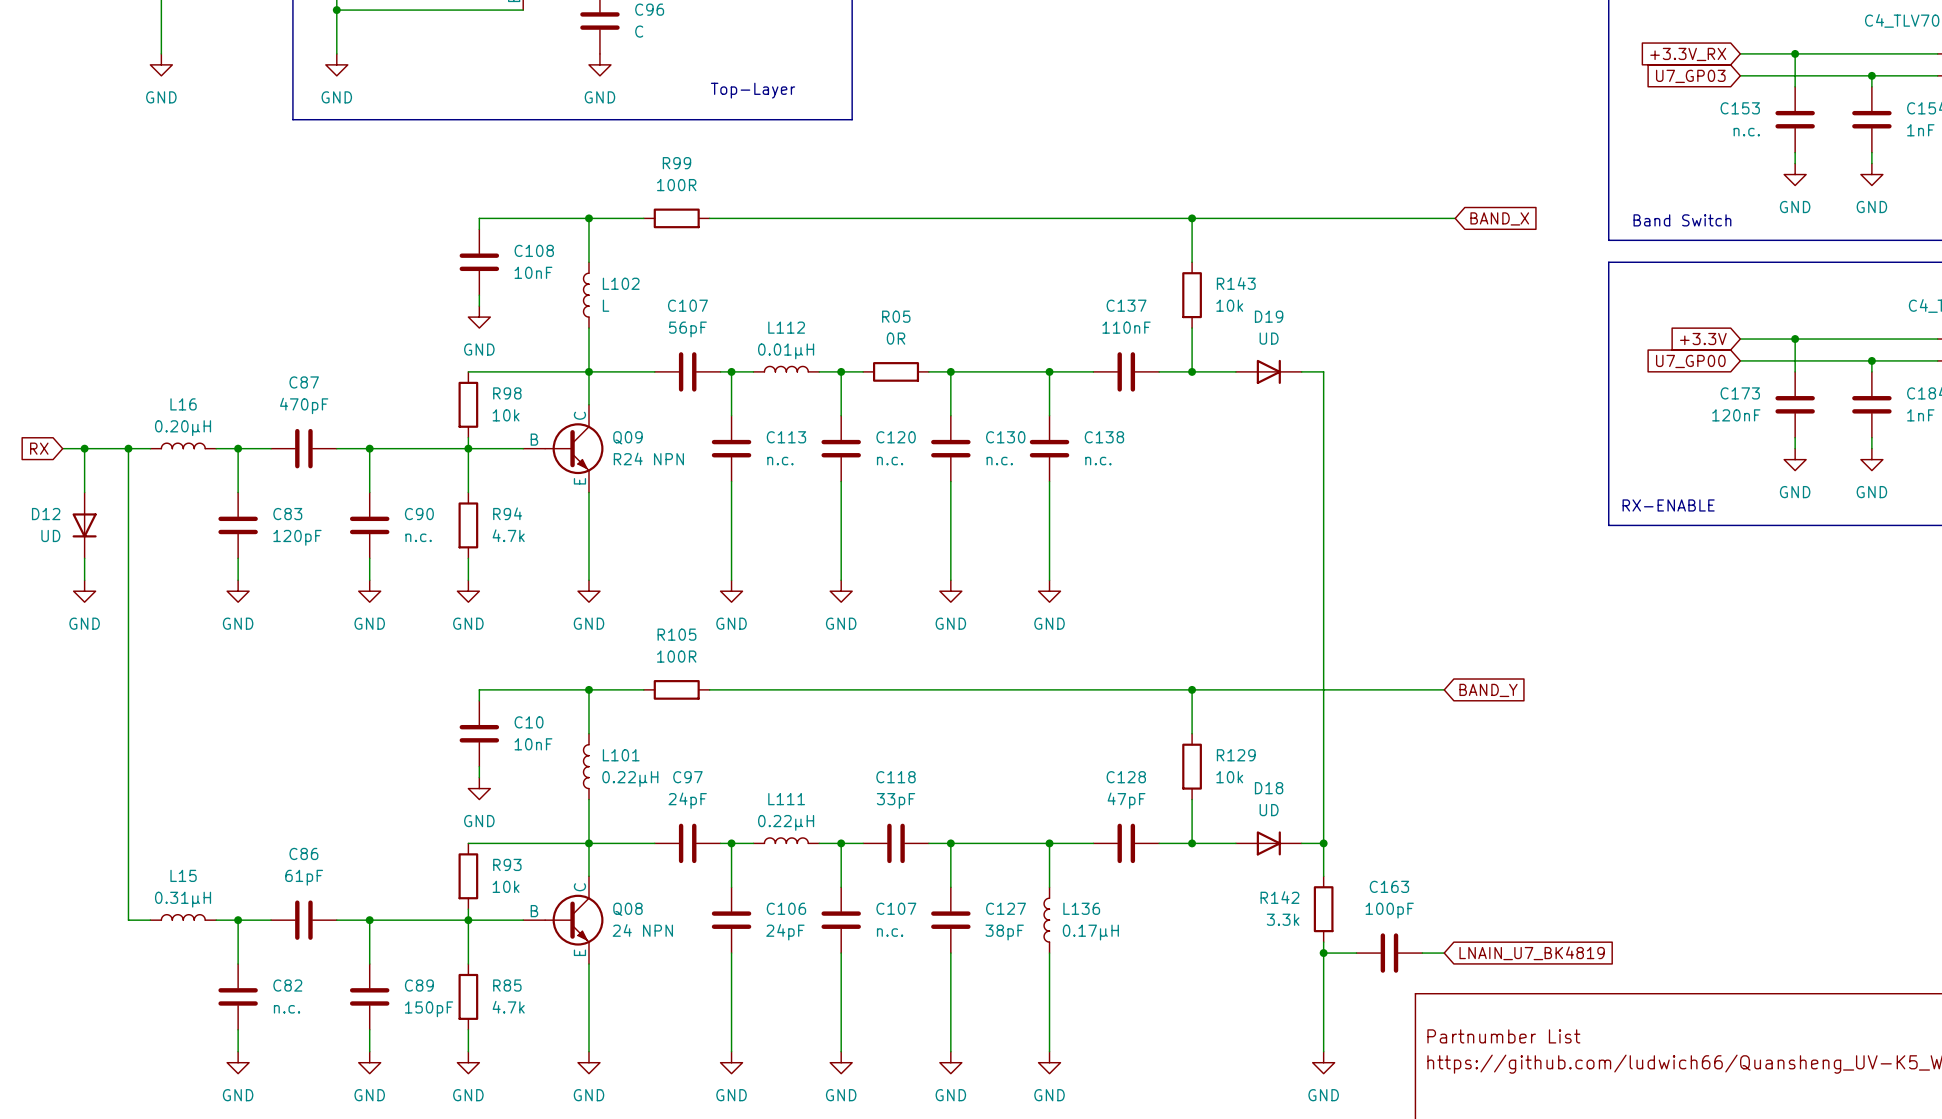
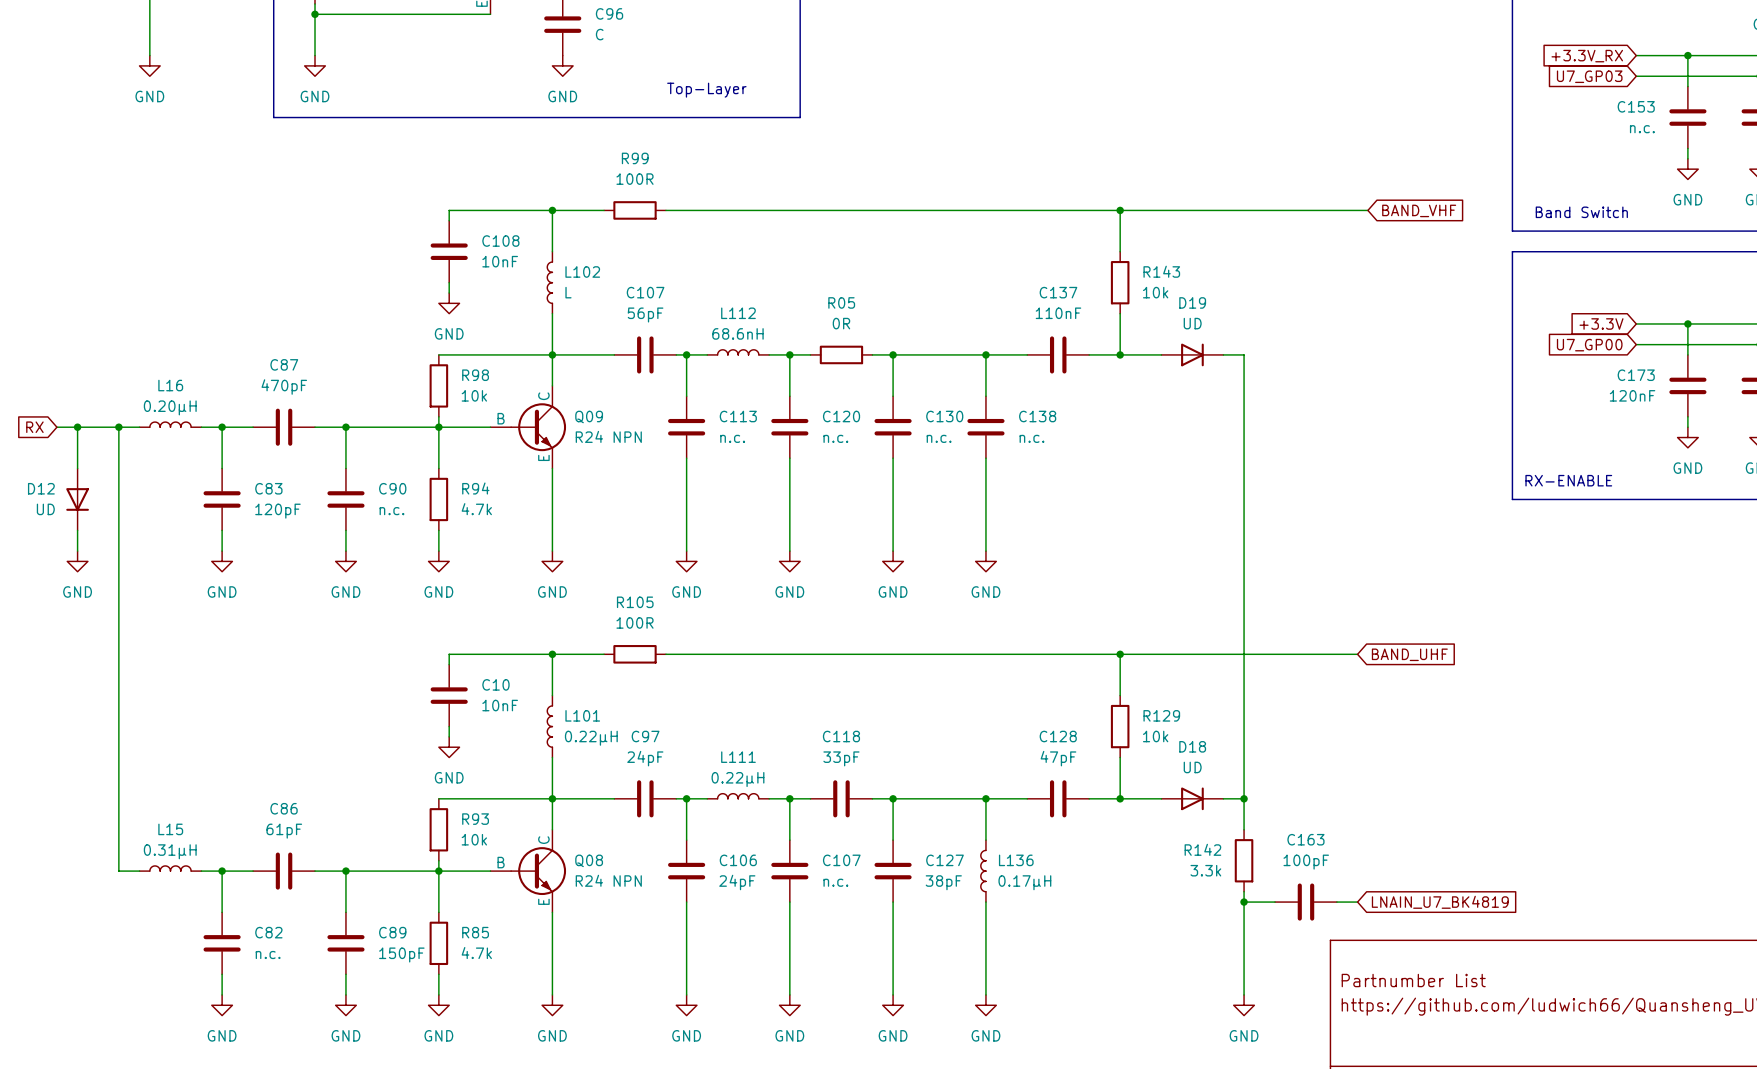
global label: BAND_X (1499, 218) -> BAND_VHF (1419, 210)
L112 value: 0.01µH (786, 351) -> 68.6nH (737, 333)
global label: BAND_Y (1488, 690) -> BAND_UHF (1409, 654)
Q08 value: 24 NPN (642, 930) -> R24 NPN (608, 880)

